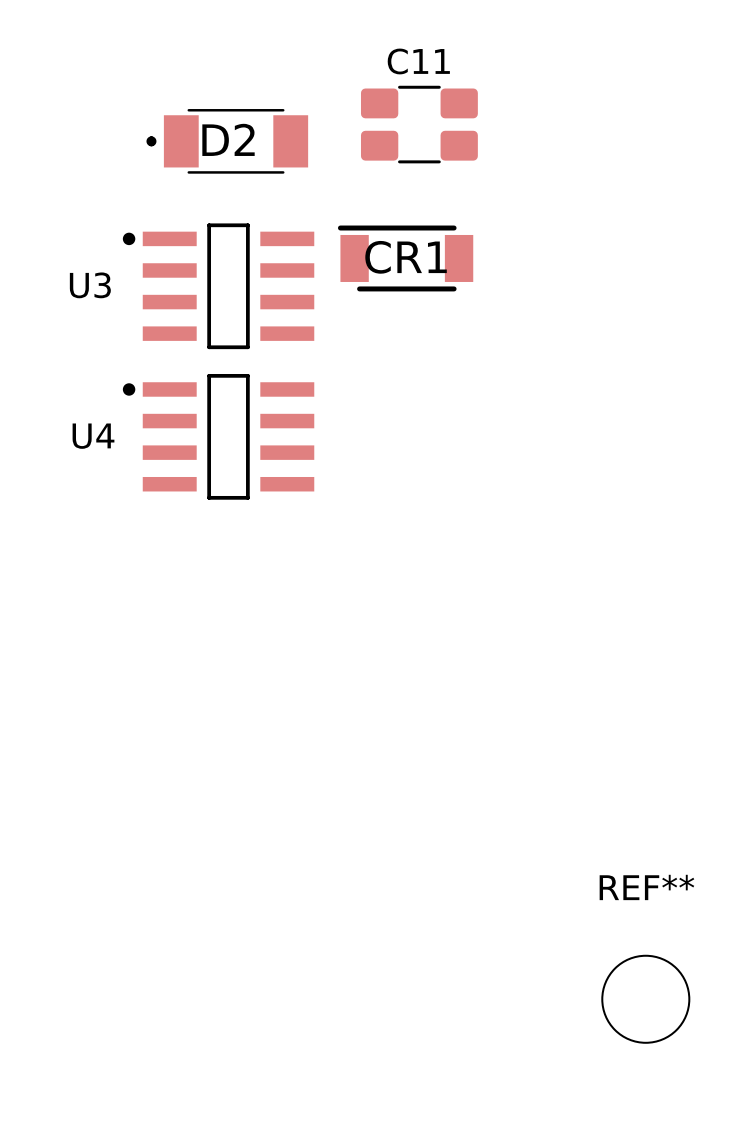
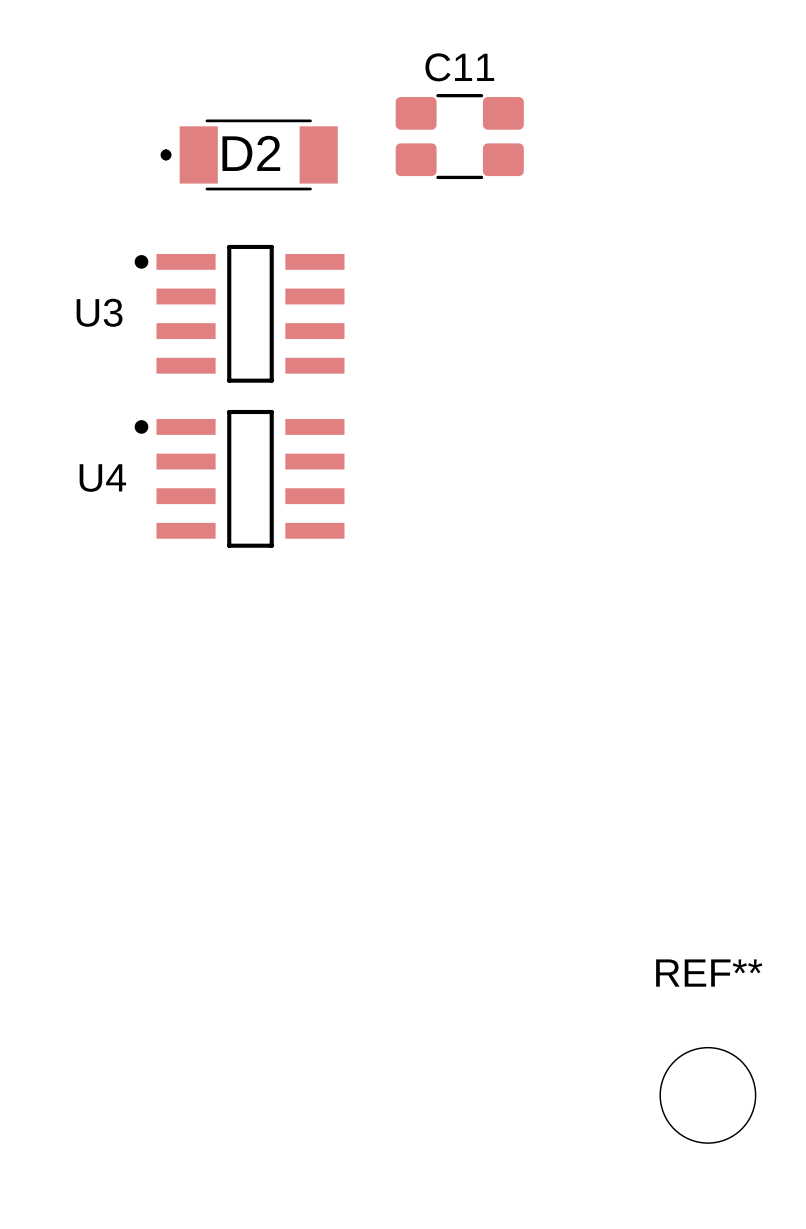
CR1: (405, 258) -> none

